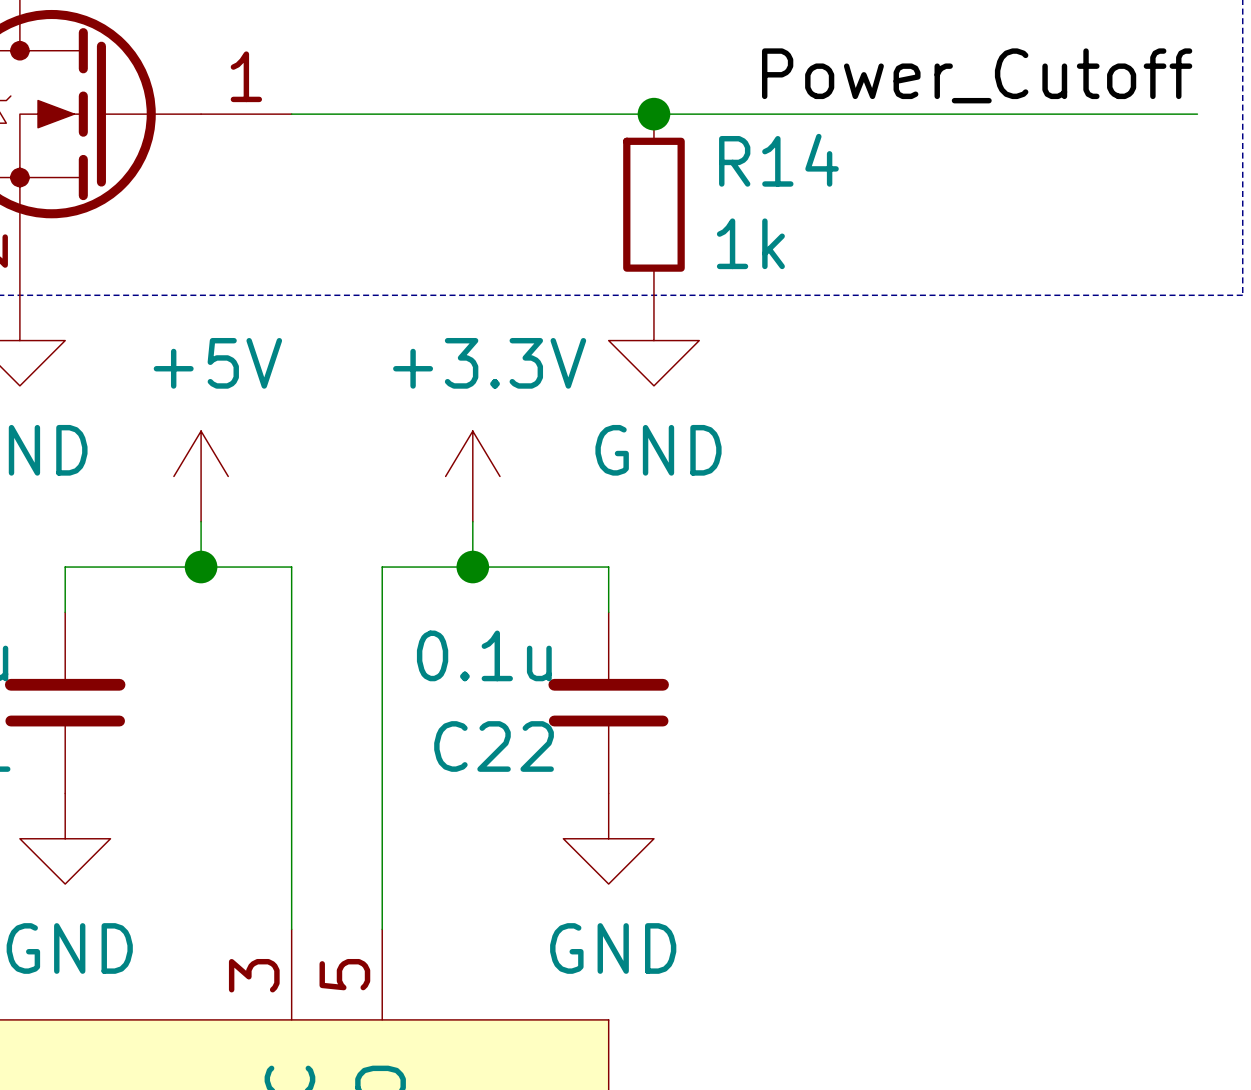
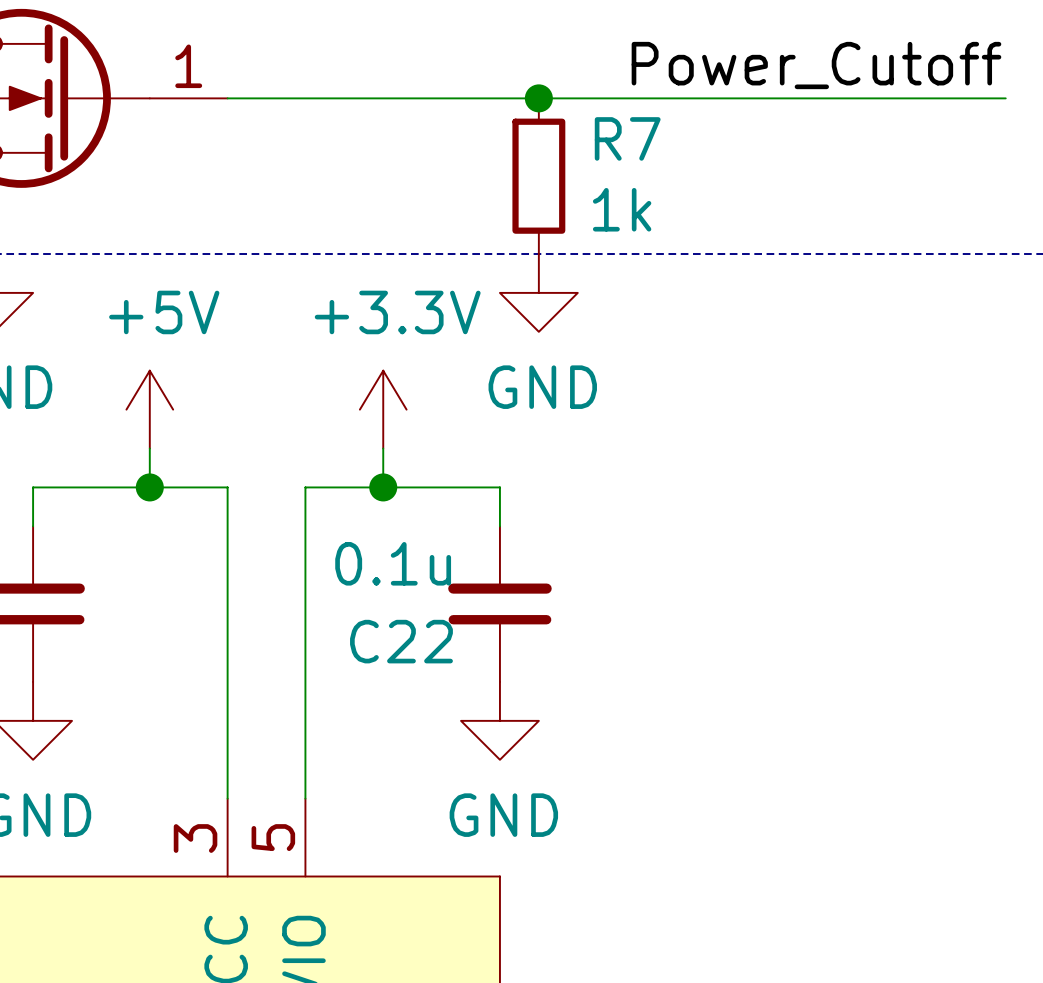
R14 name: R14 (778, 160) -> R7 (627, 138)

